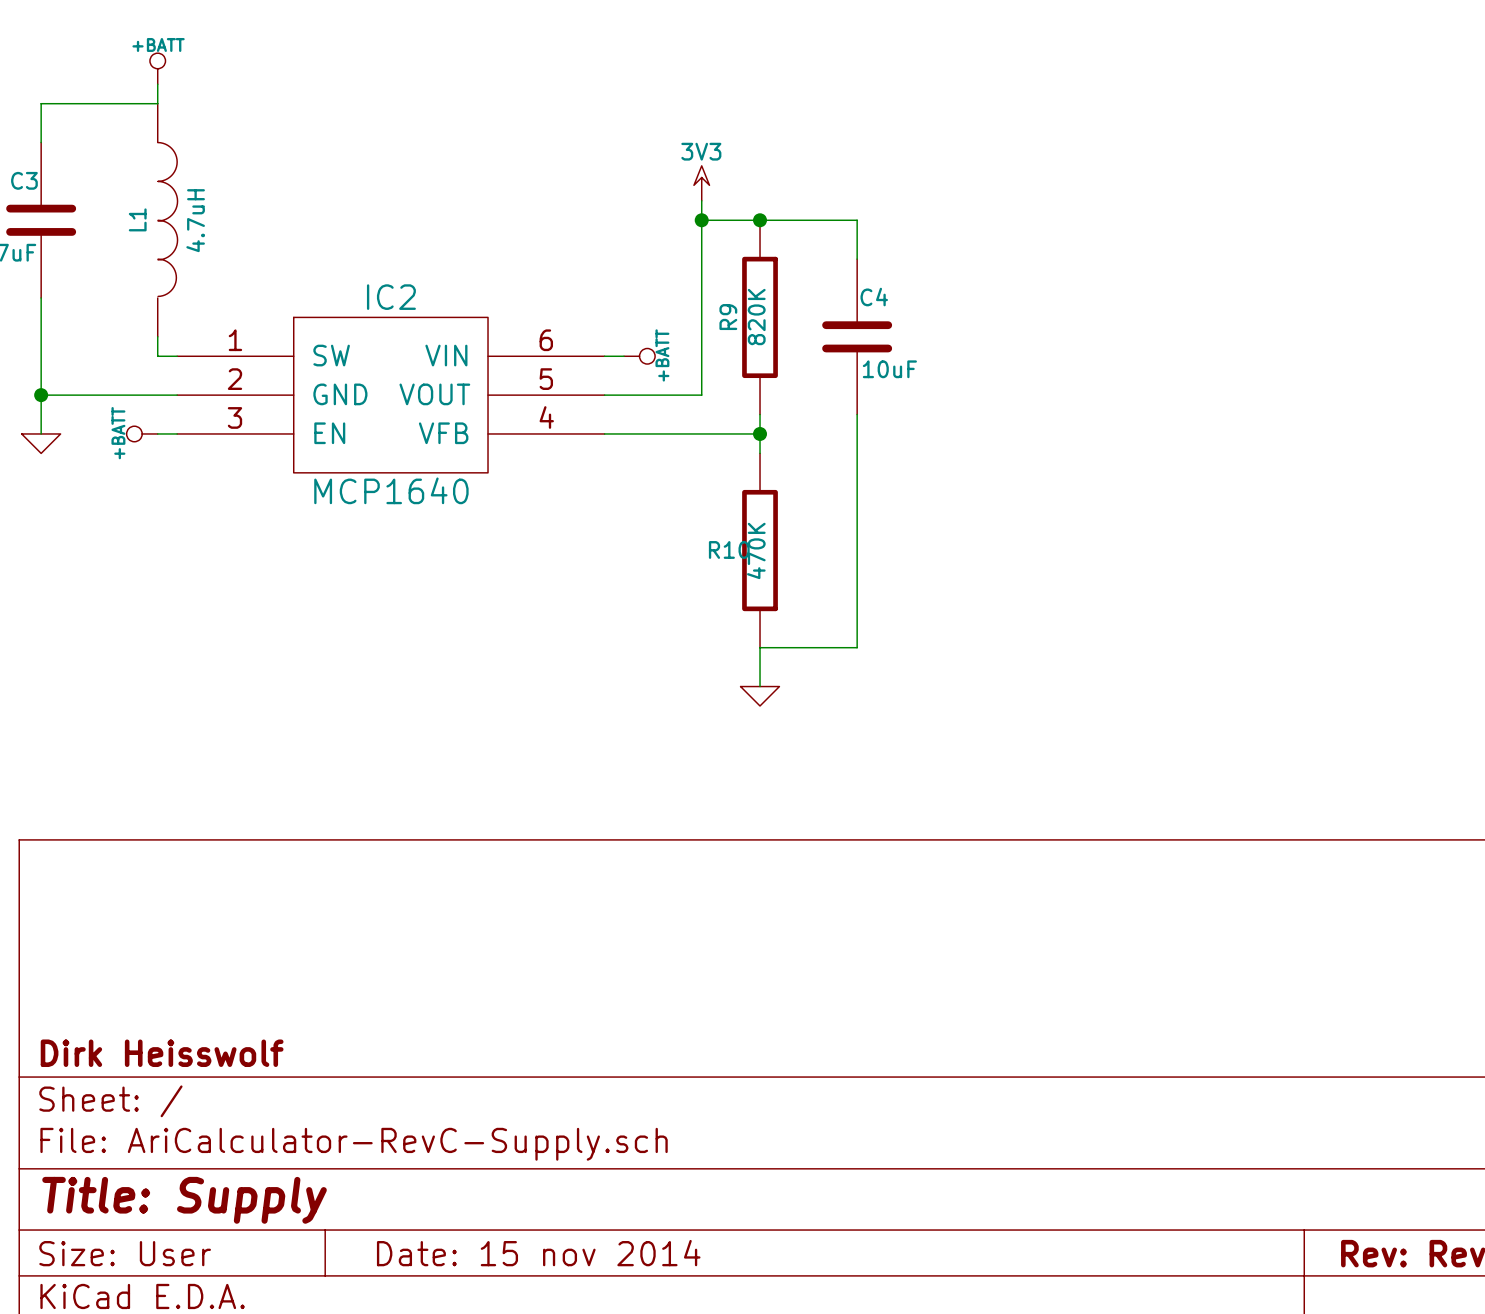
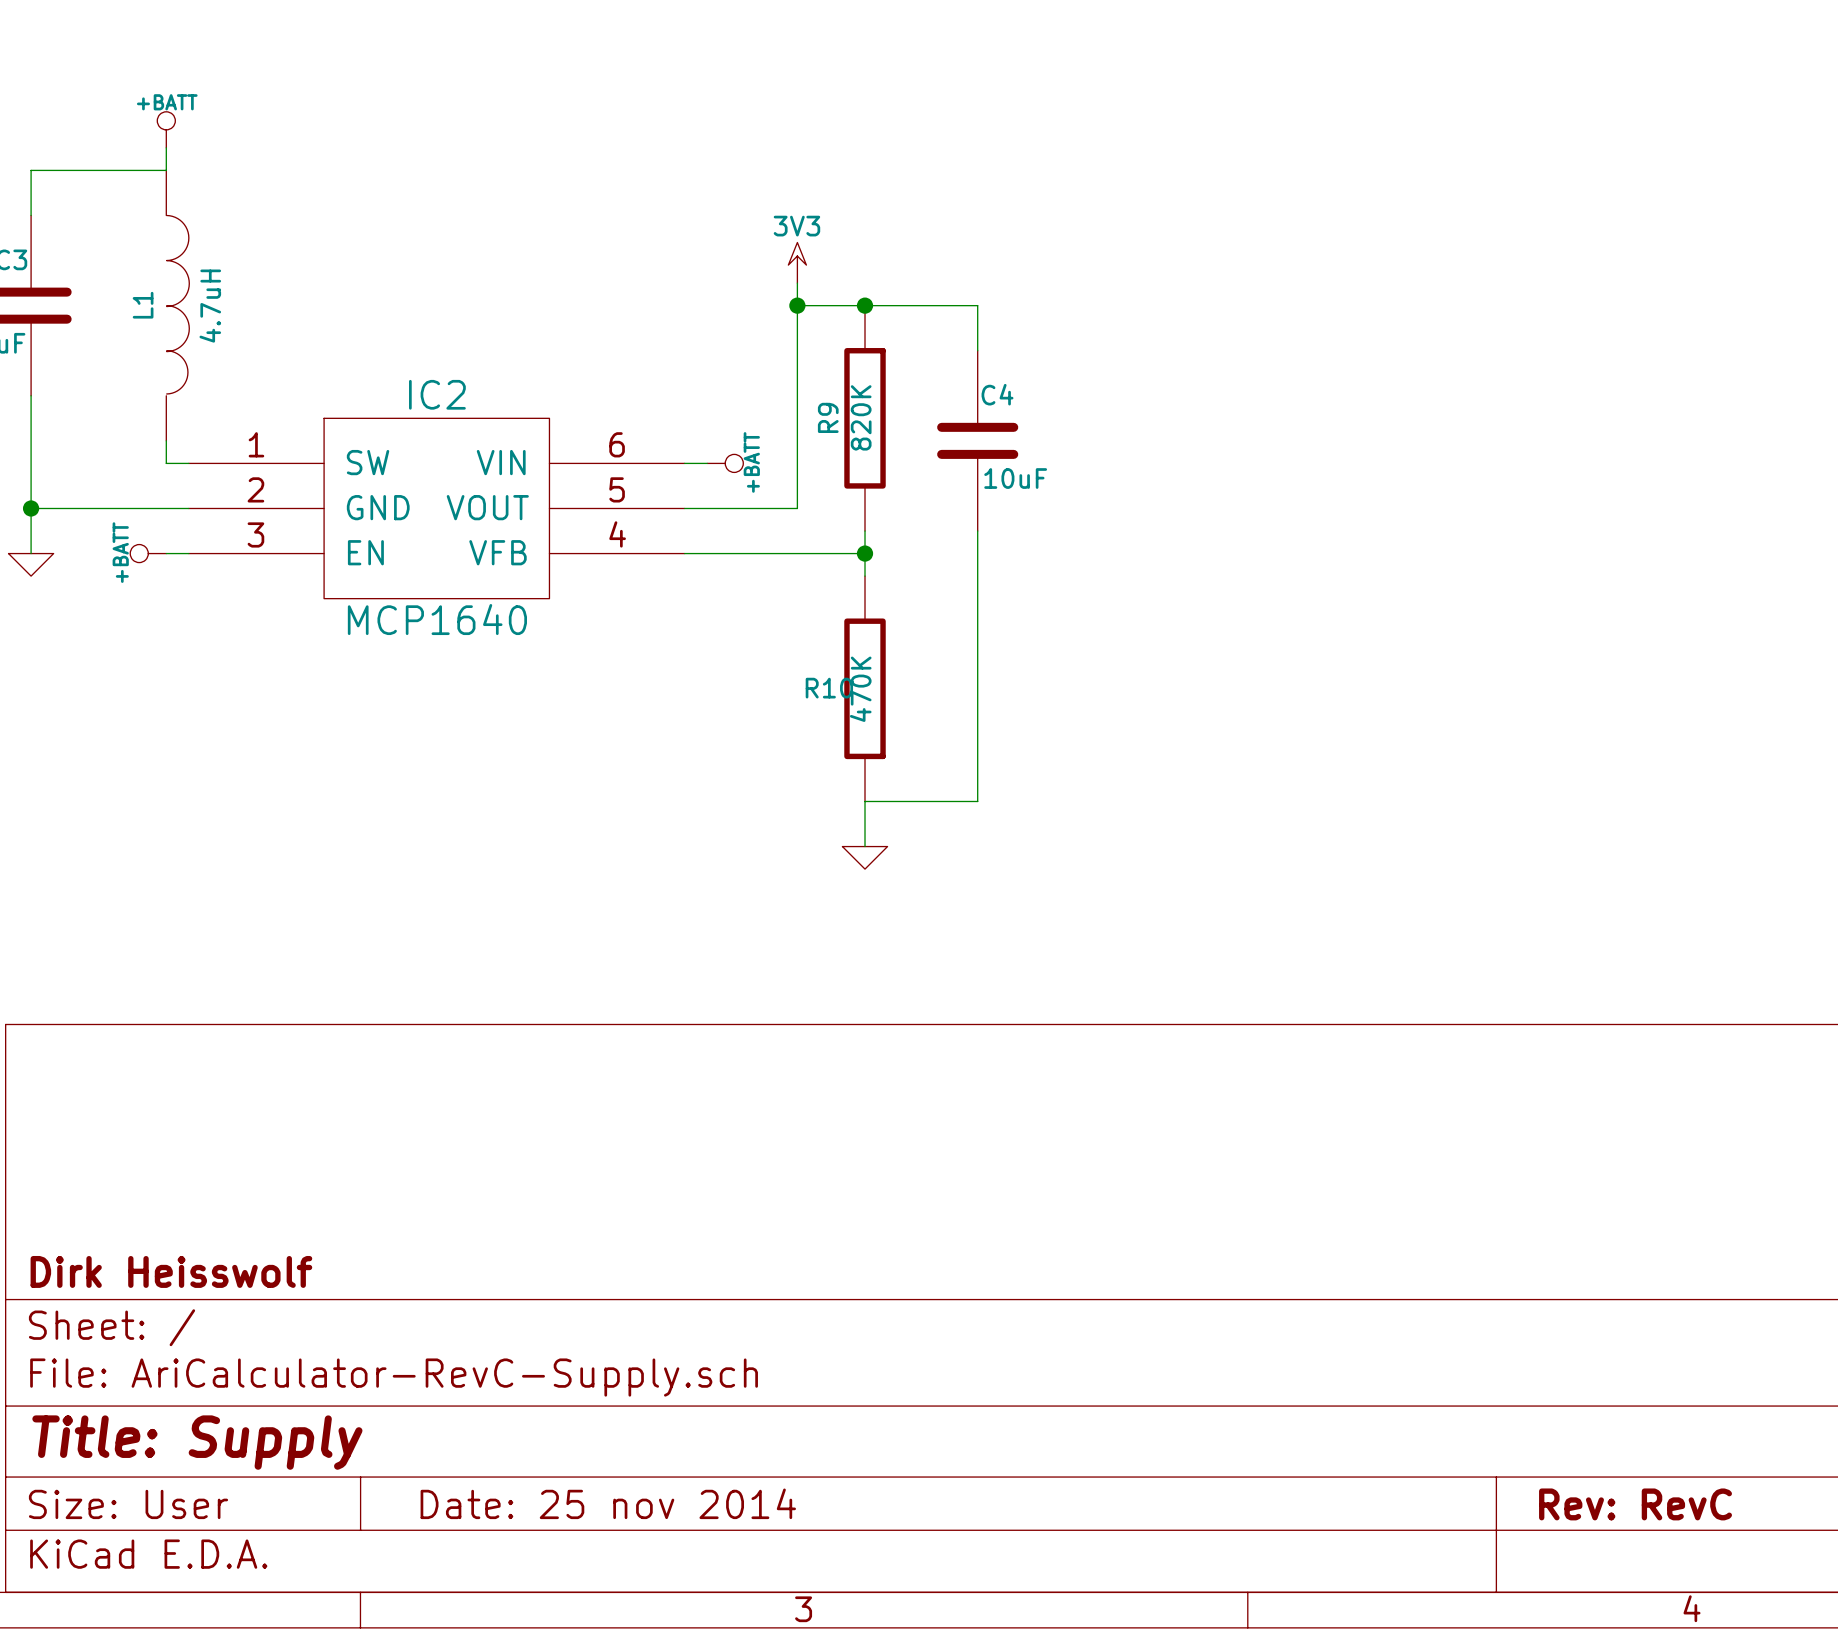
title block: Date: 15 nov 2014 (538, 1253) -> Date: 25 nov 2014 (608, 1503)

